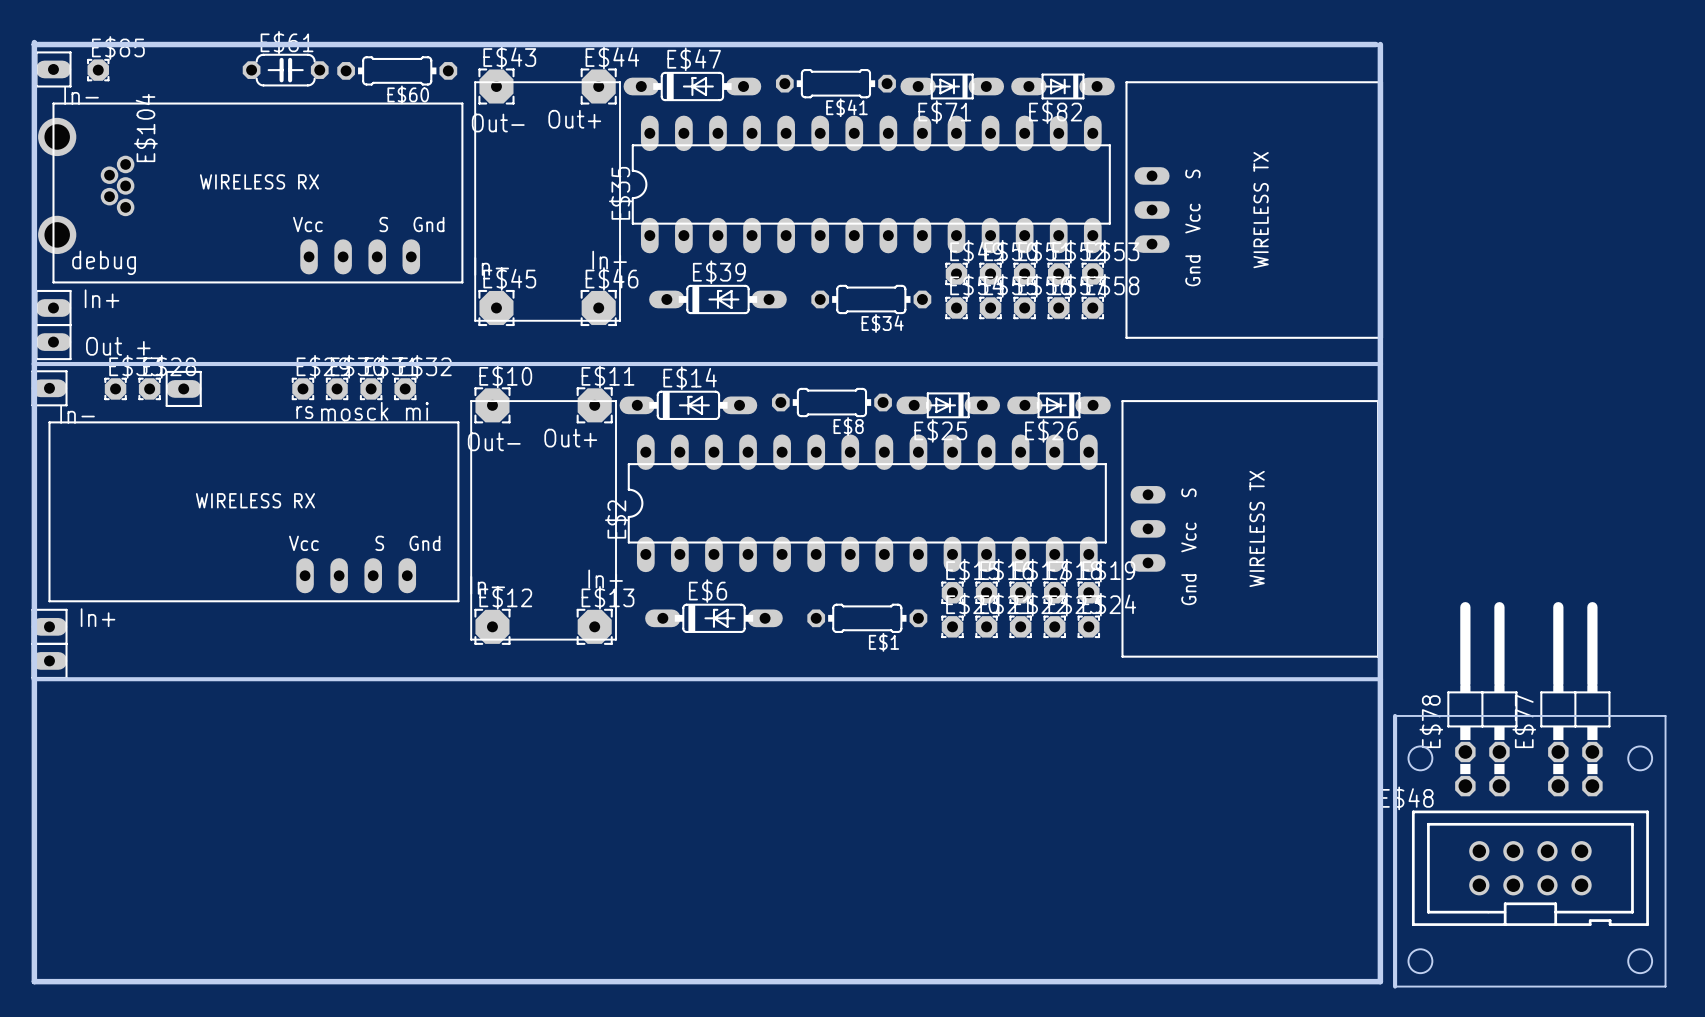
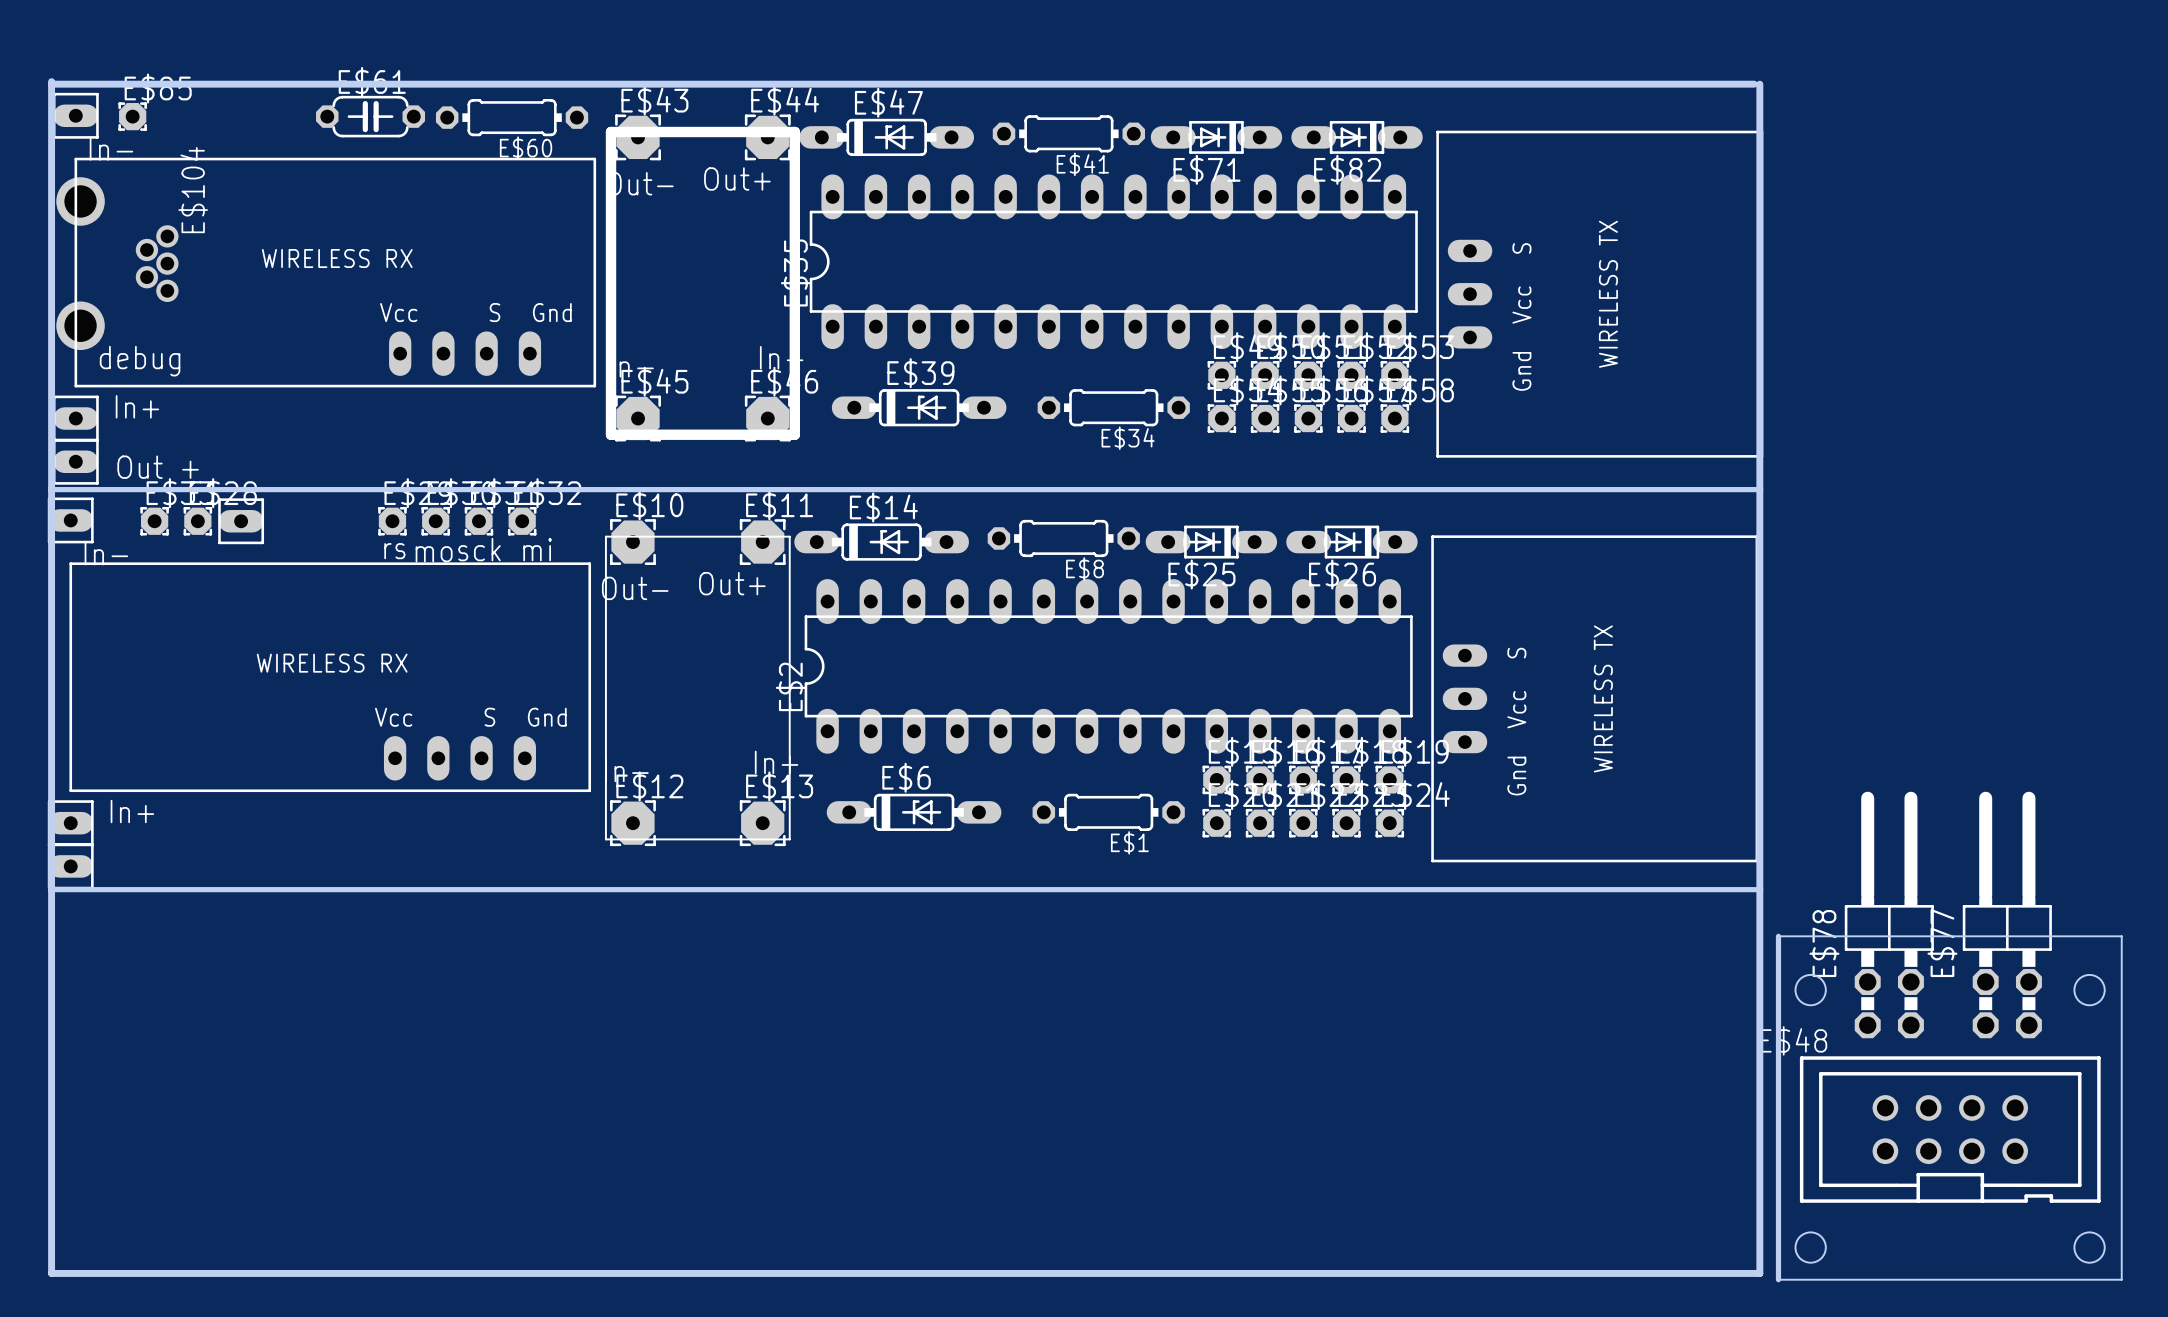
line width: thin (475, 82) (475, 320) (620, 320) (620, 82) (475, 82) -> thick (611, 132) (611, 434) (794, 434) (794, 132) (611, 132)

